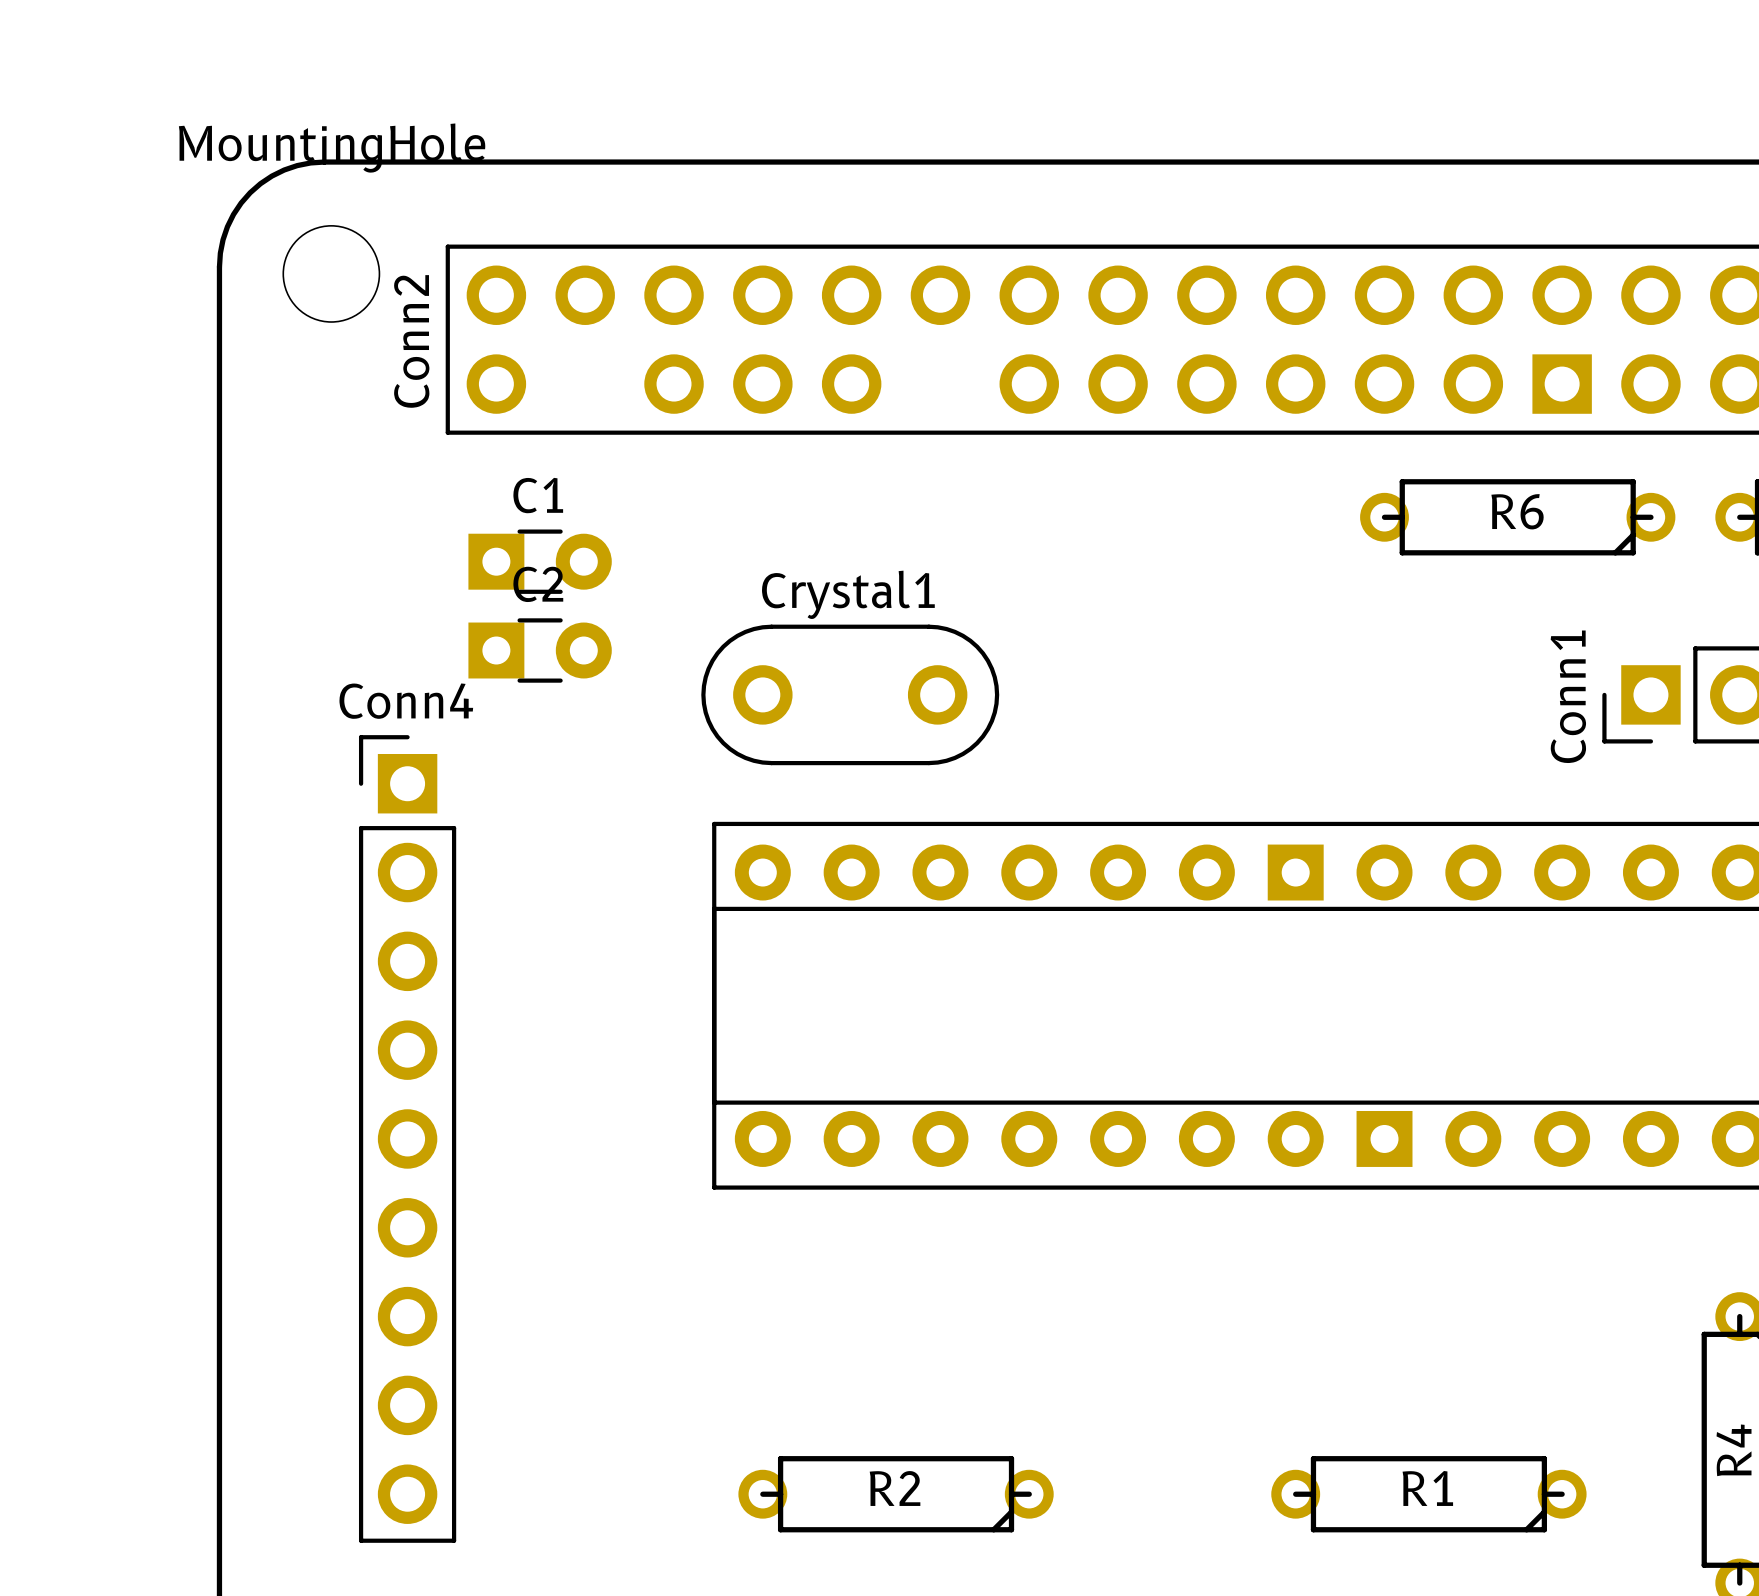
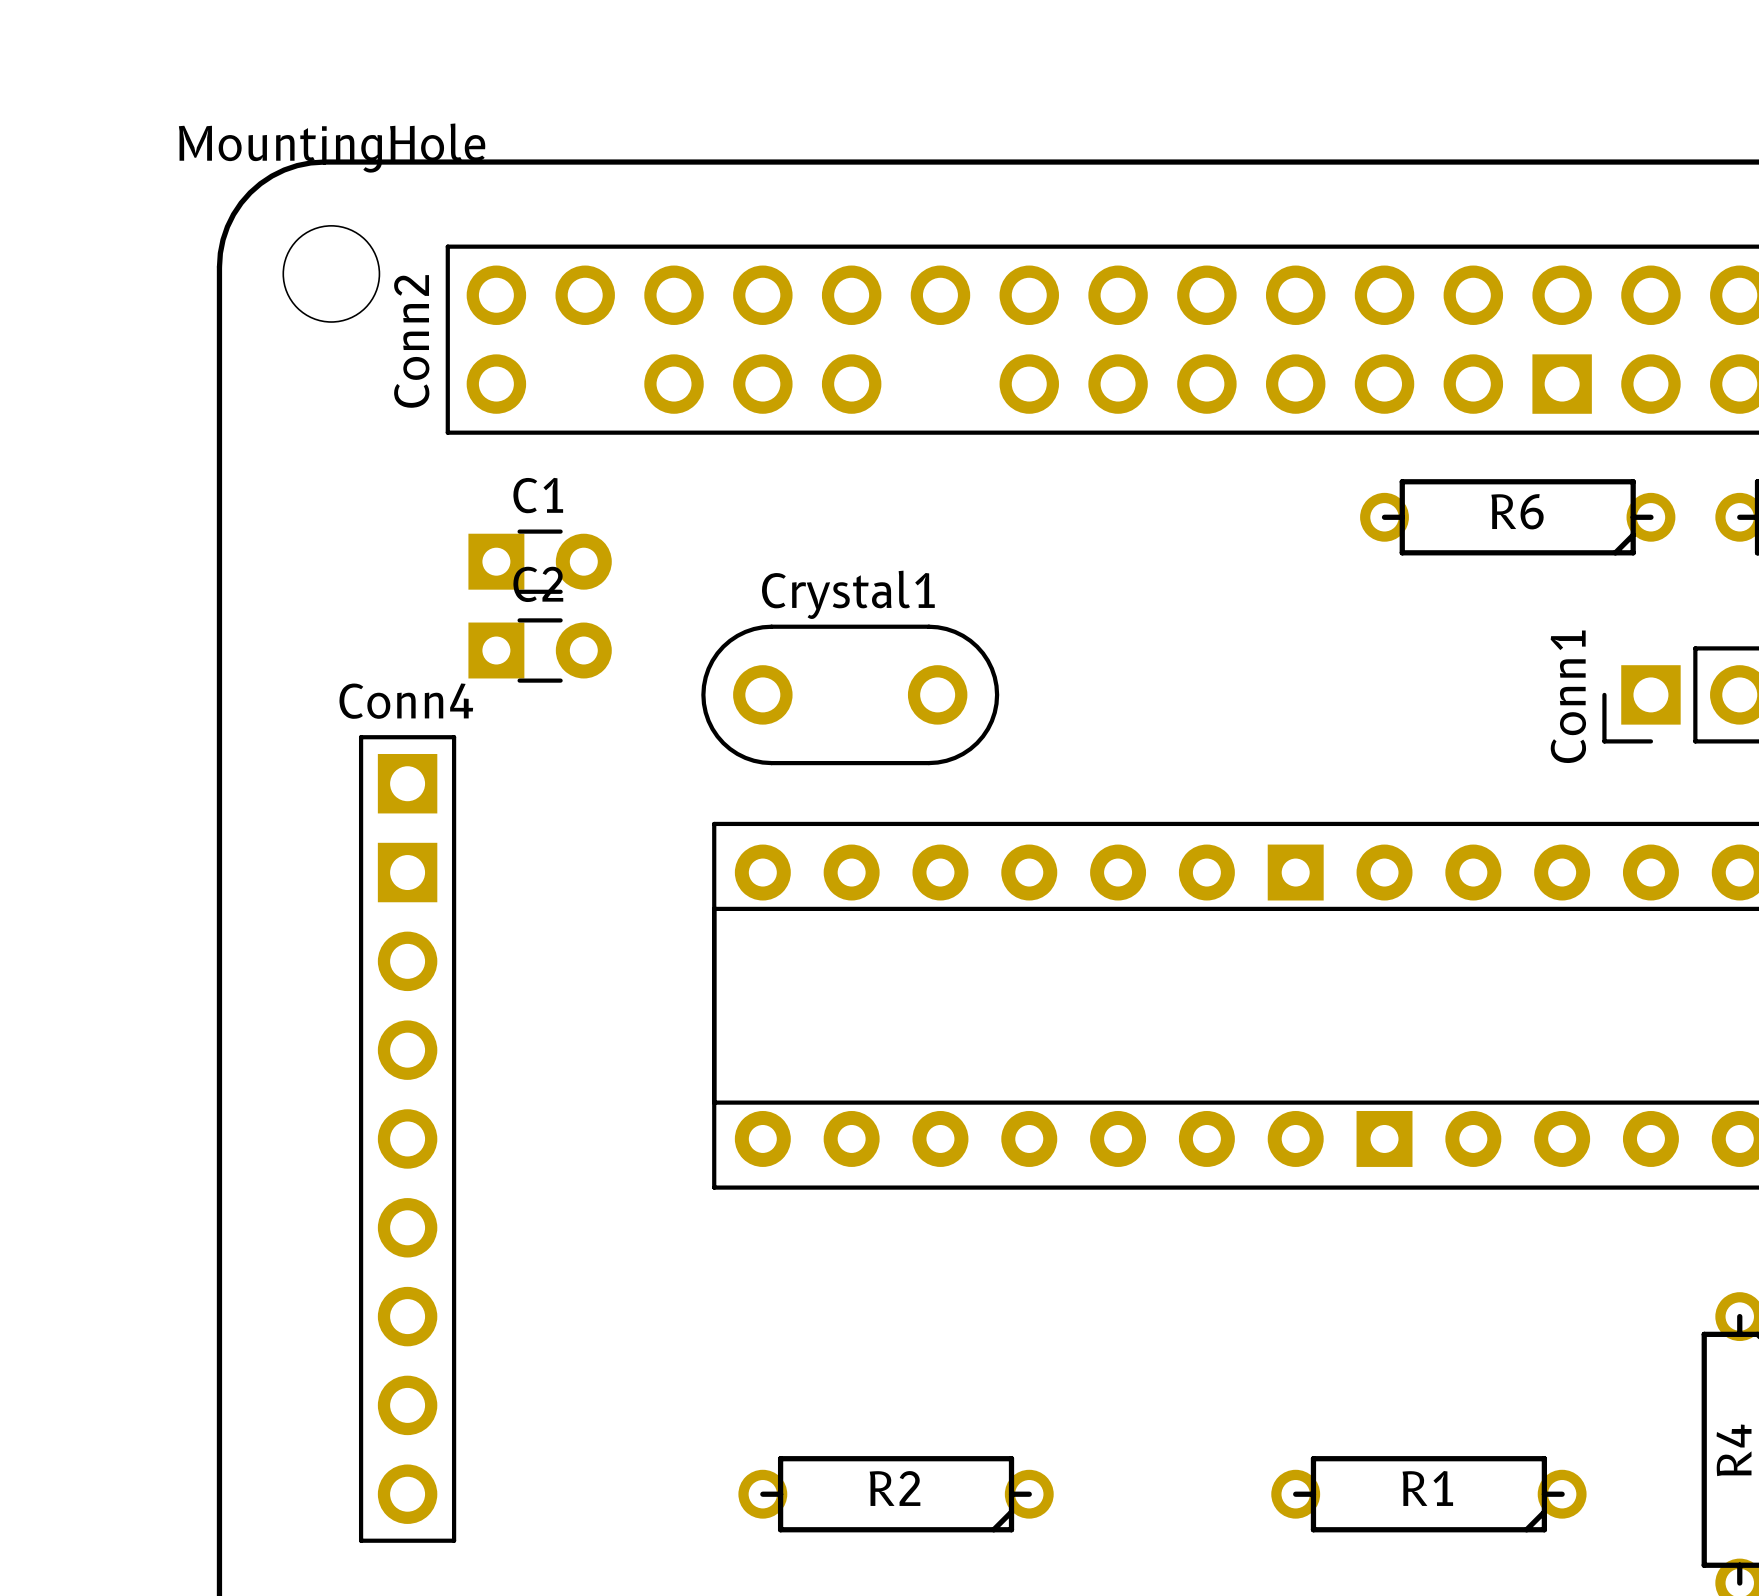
Conn4 footprint: [358, 735, 457, 1543] -> [358, 735, 457, 1543]

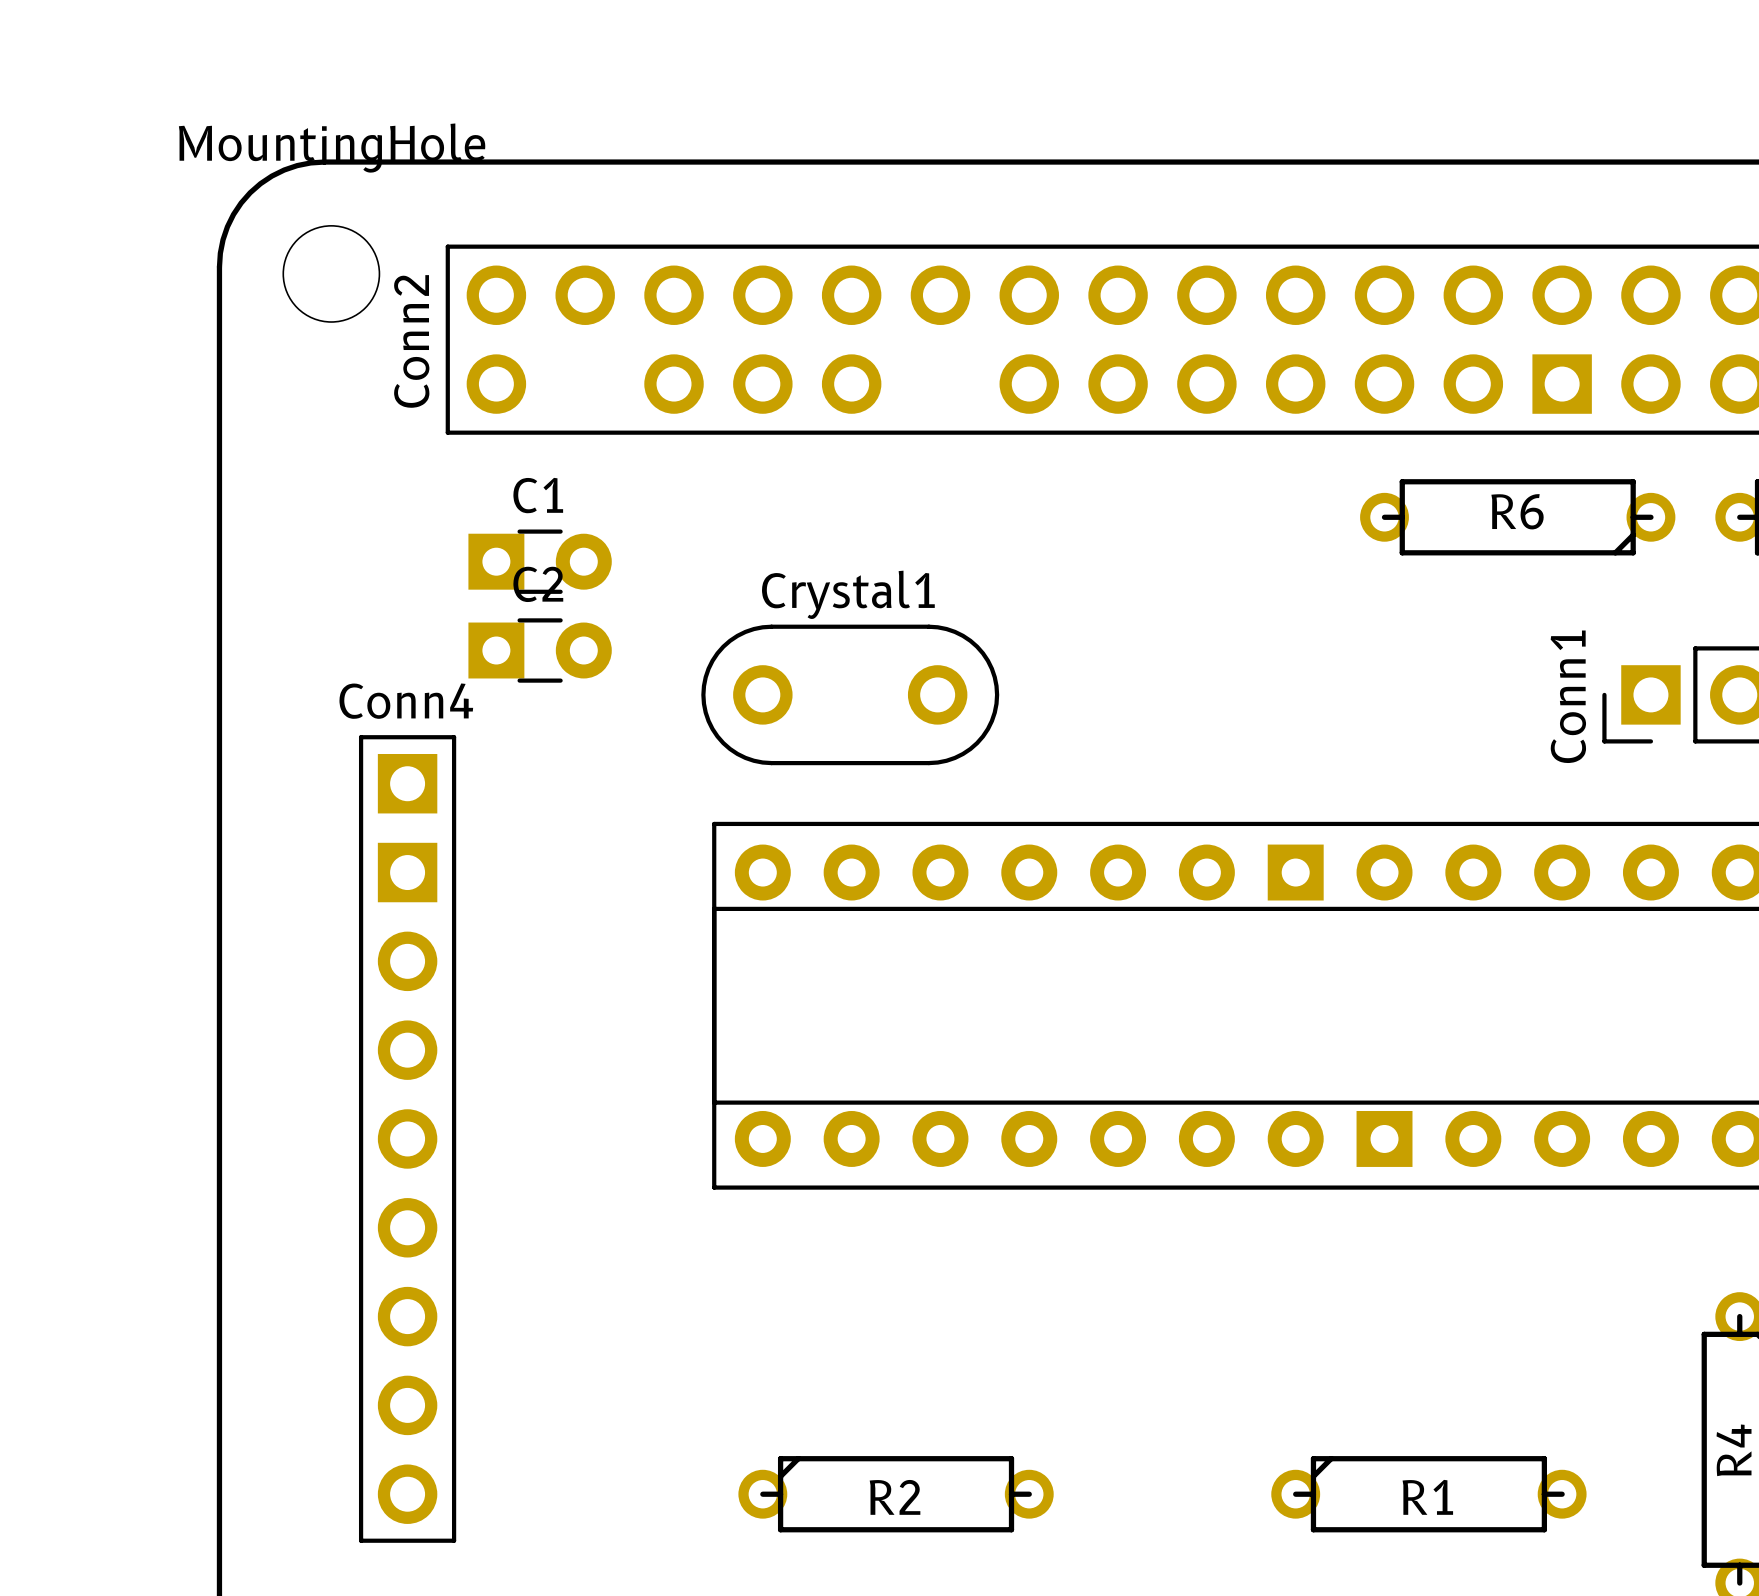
R2 rotation: 0° (896, 1494) -> 180° (896, 1494)
R1 rotation: 0° (1428, 1494) -> 180° (1428, 1494)

